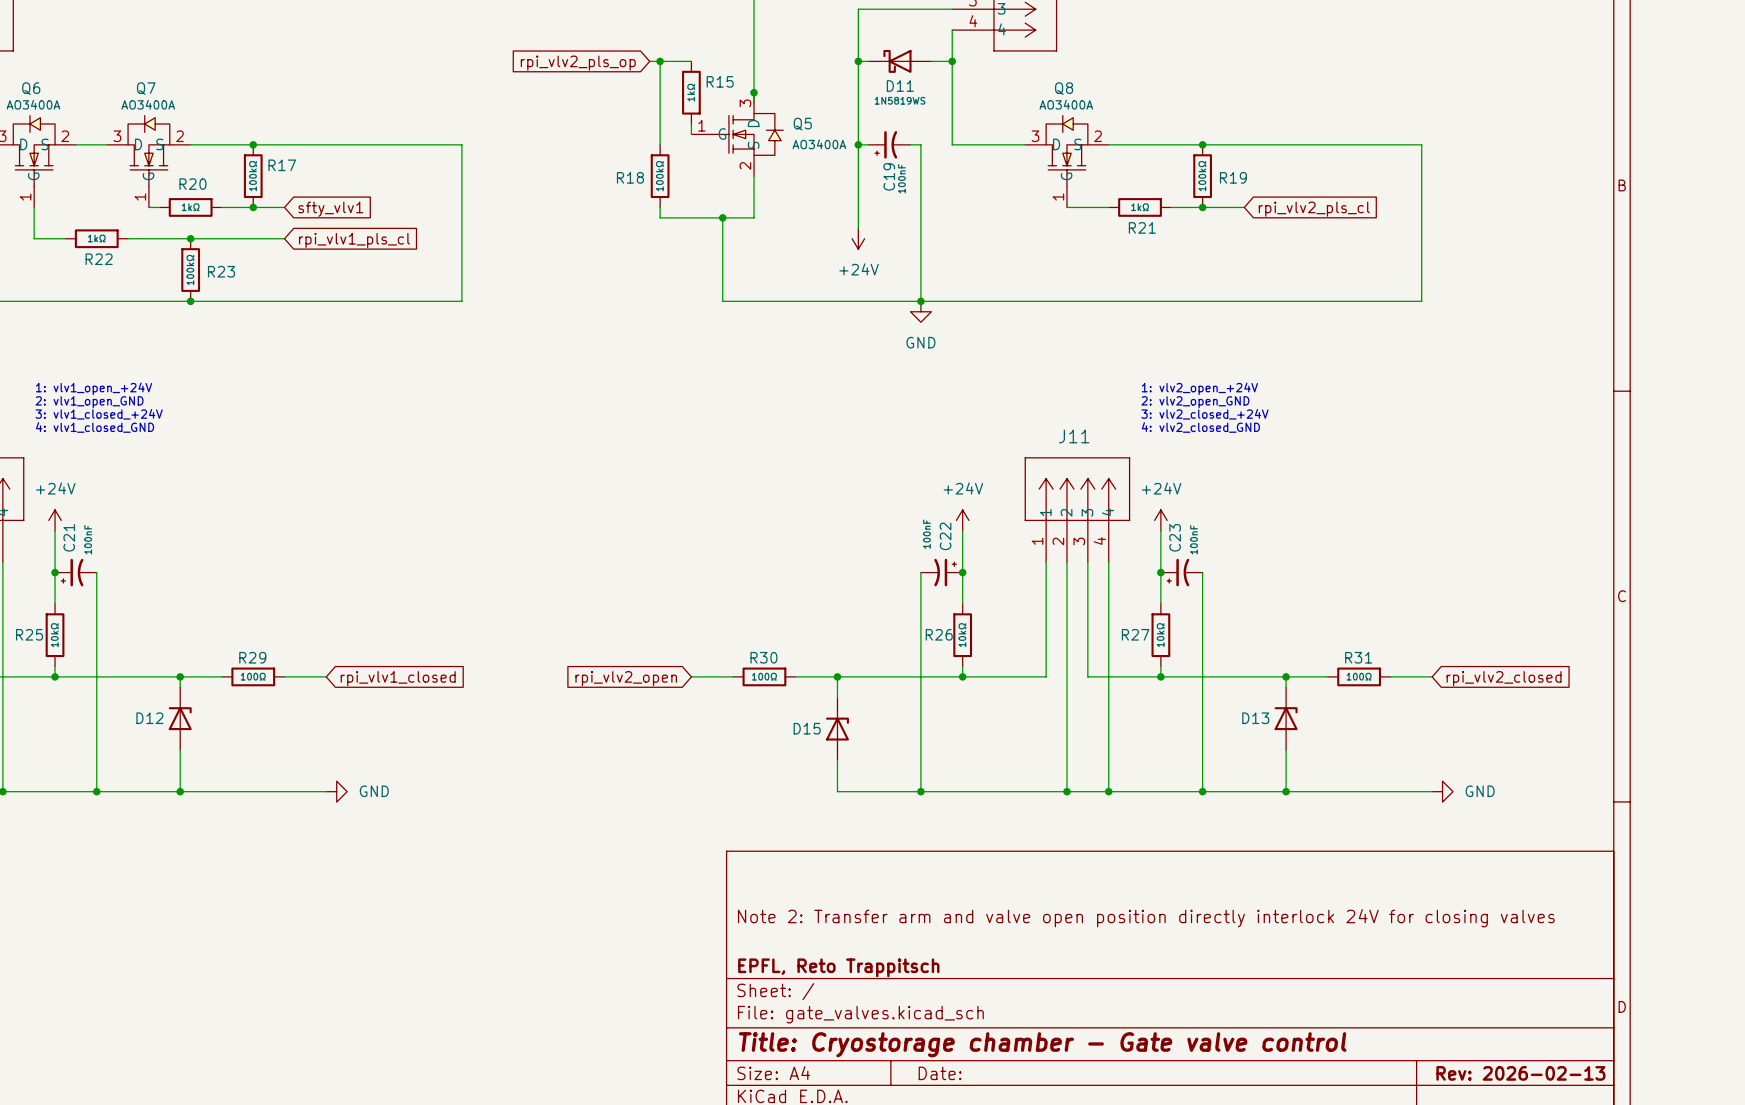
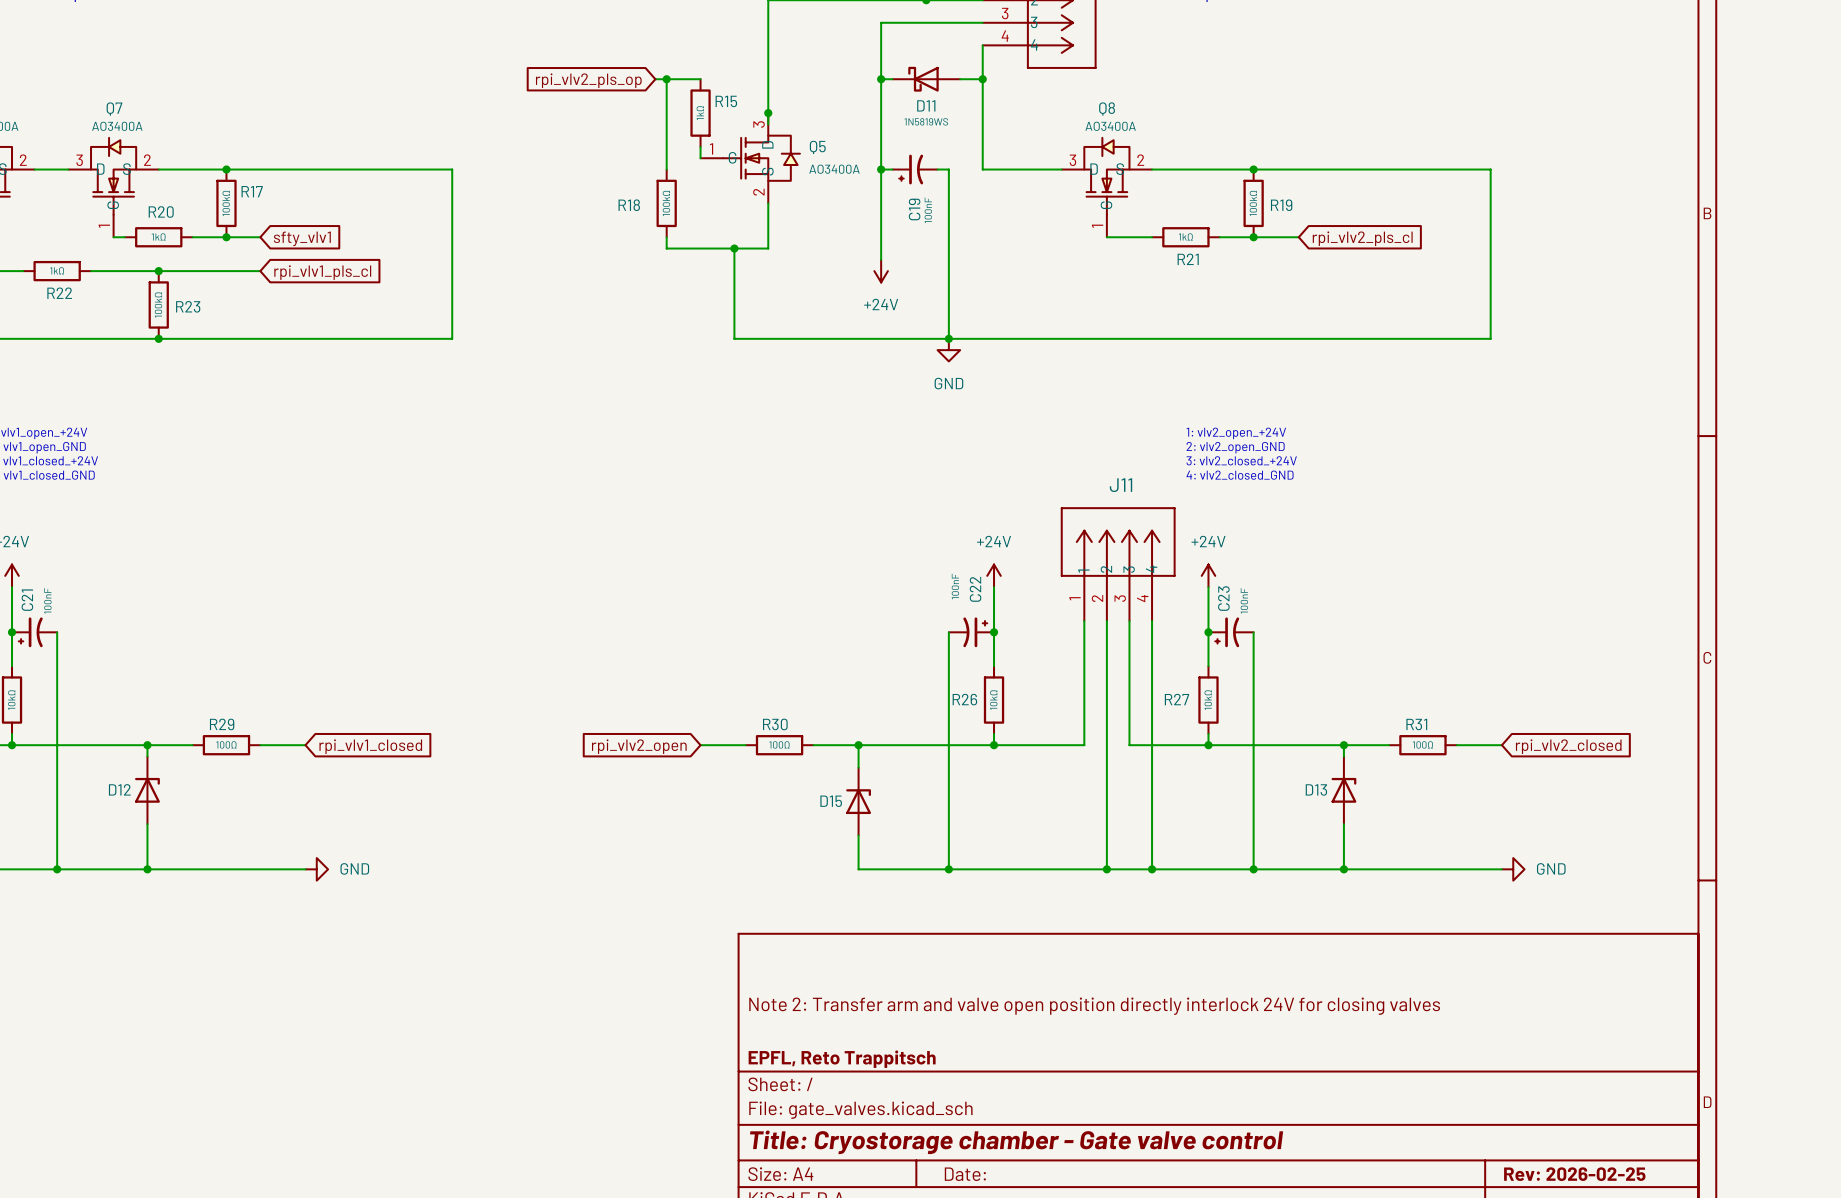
title block: Rev: 2026-02-13 (1520, 1073) -> Rev: 2026-02-25 (1574, 1174)

